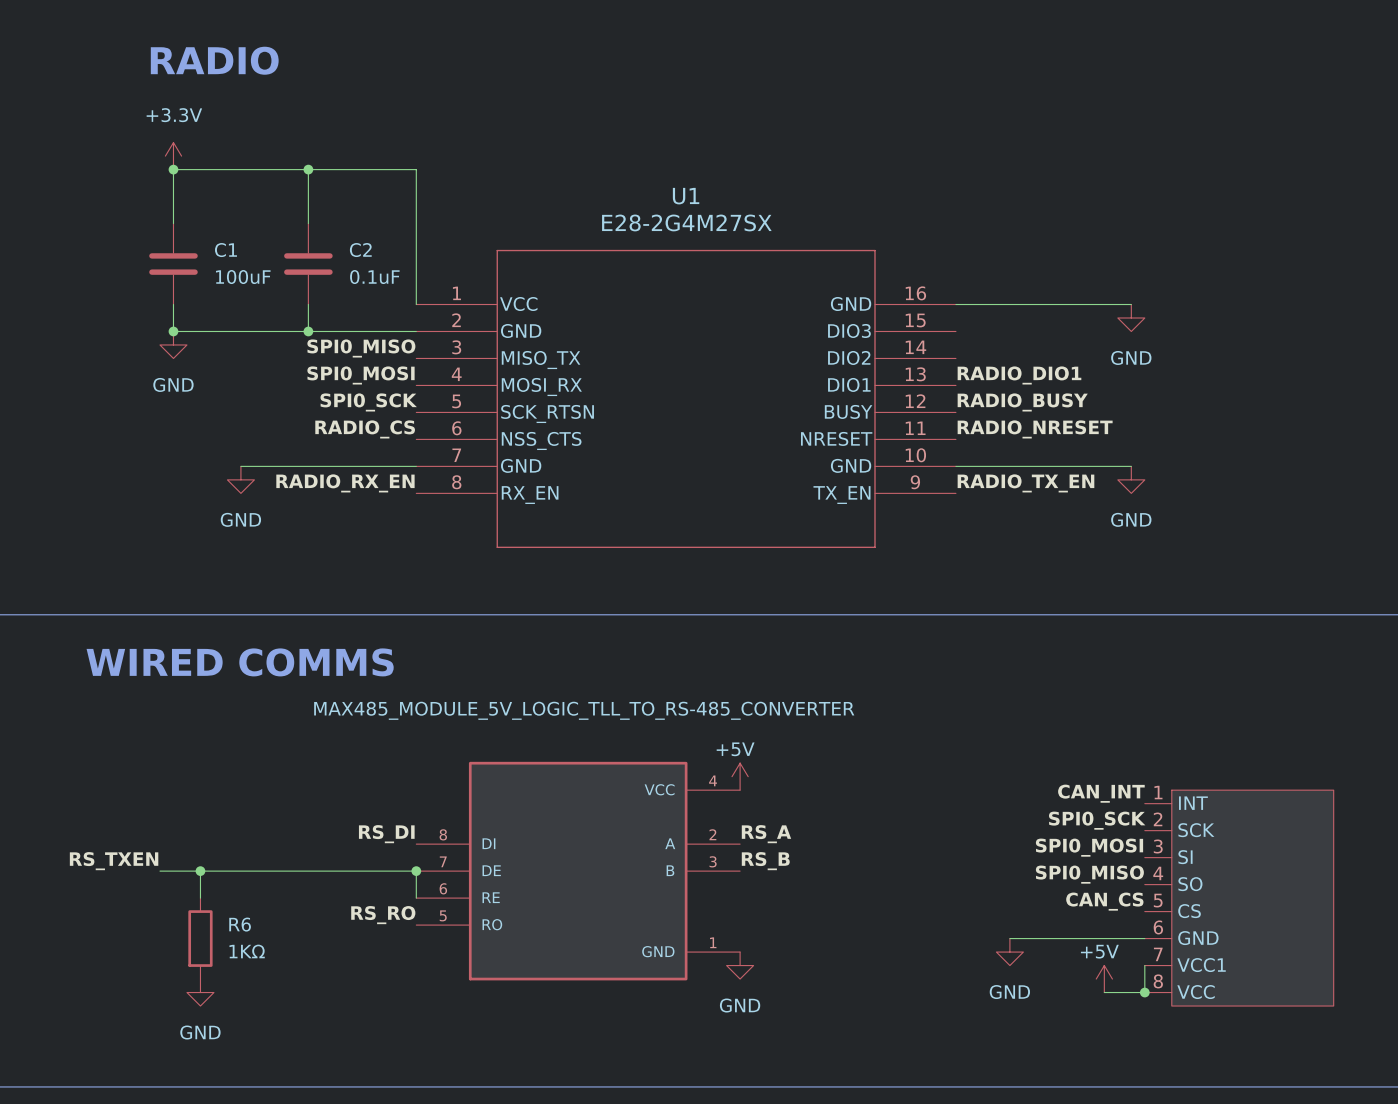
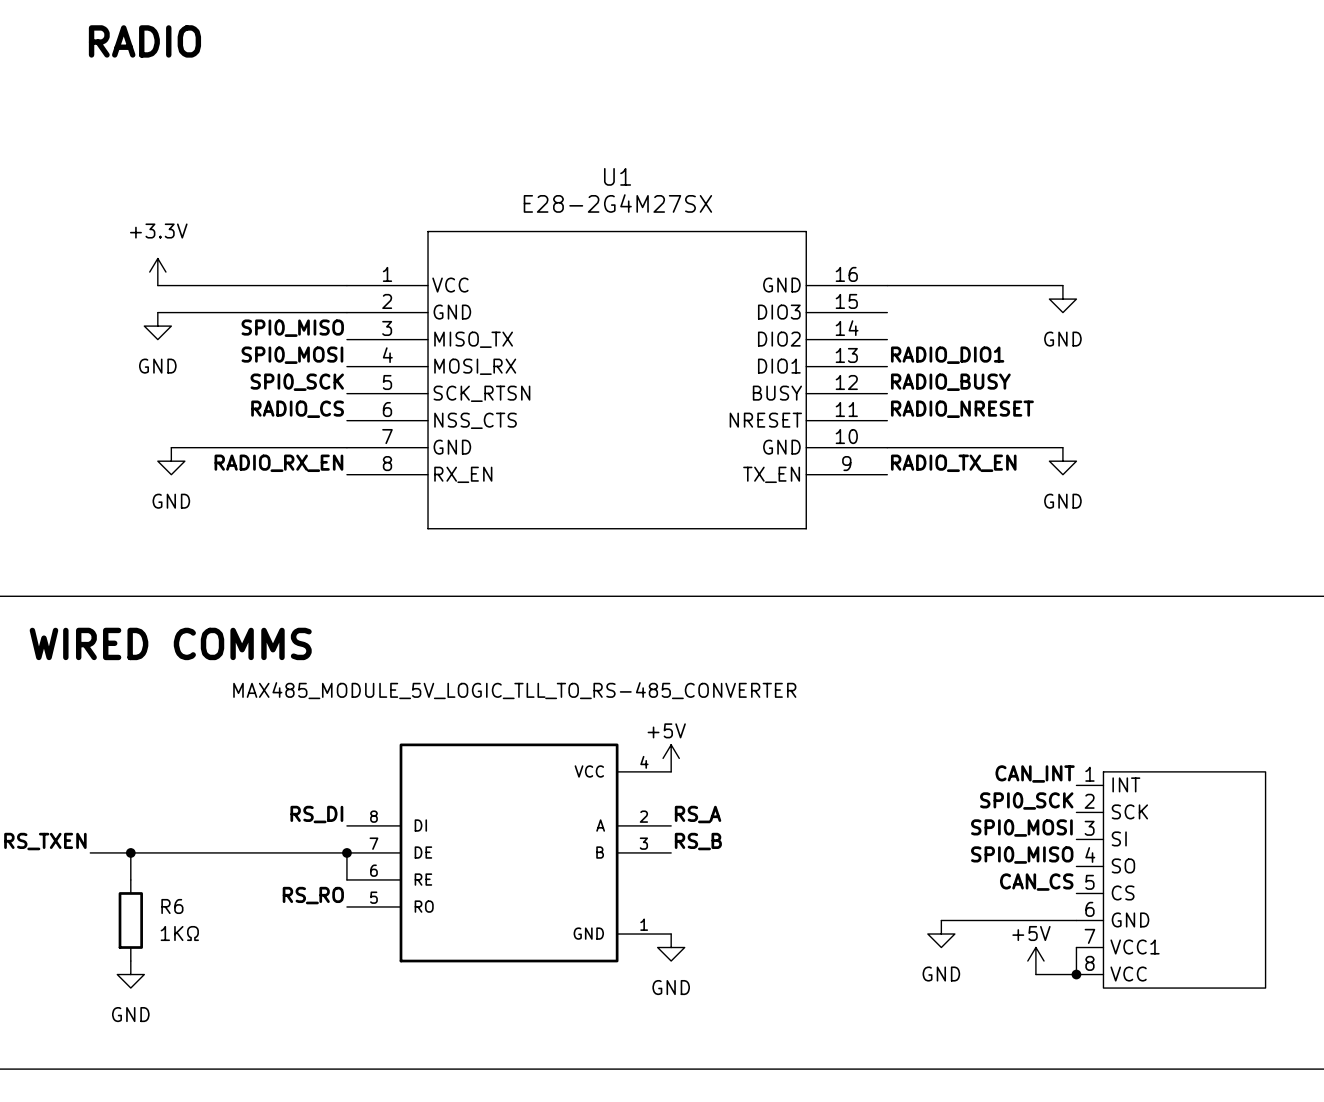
power symbol position: +3.3V (173, 156) -> +3.3V (157, 272)
junction: (173, 169) -> none
wire: (308, 169) (308, 223) -> none
junction: (308, 169) -> none
wire: (173, 223) (173, 169) (416, 169) (416, 304) -> (157, 285) (346, 285)
C1: 100uF (173, 264) -> none
C2: 0.1uF (308, 264) -> none
wire: (173, 304) (173, 331) (227, 331) -> none
wire: (308, 304) (308, 331) -> none
junction: (173, 331) -> none
junction: (308, 331) -> none
power symbol position: GND (173, 344) -> GND (157, 326)

